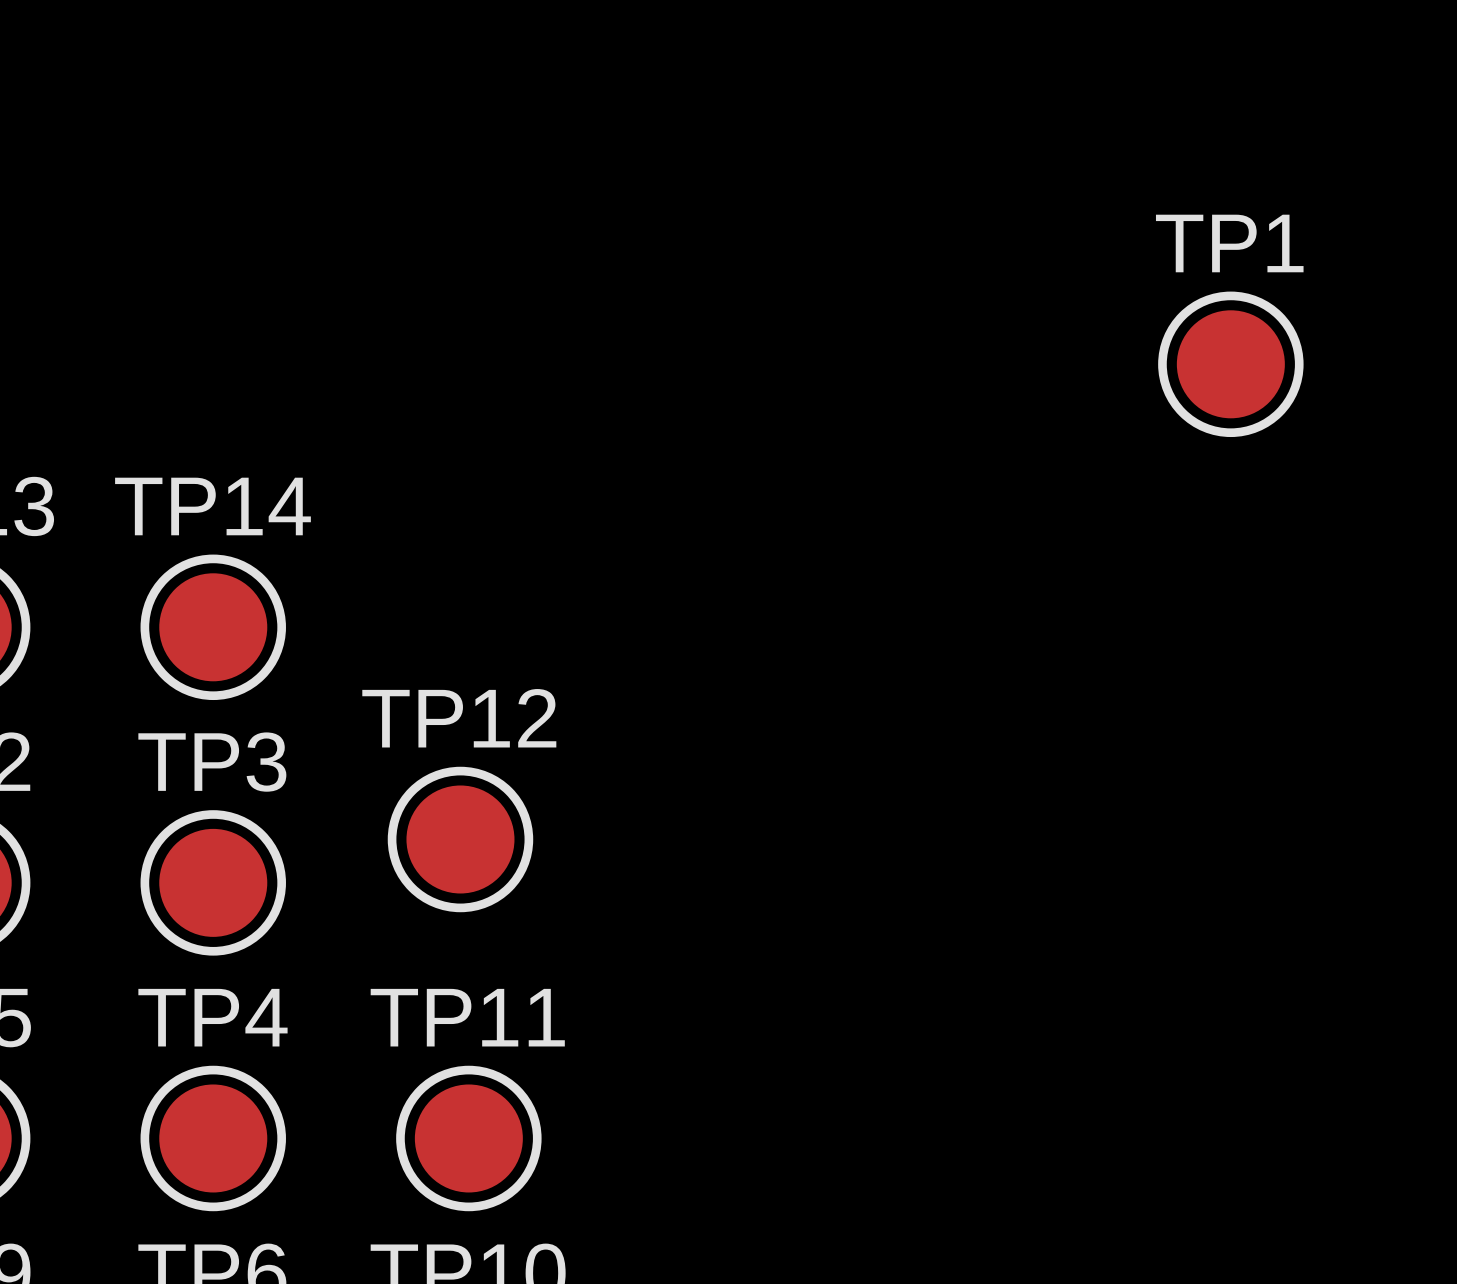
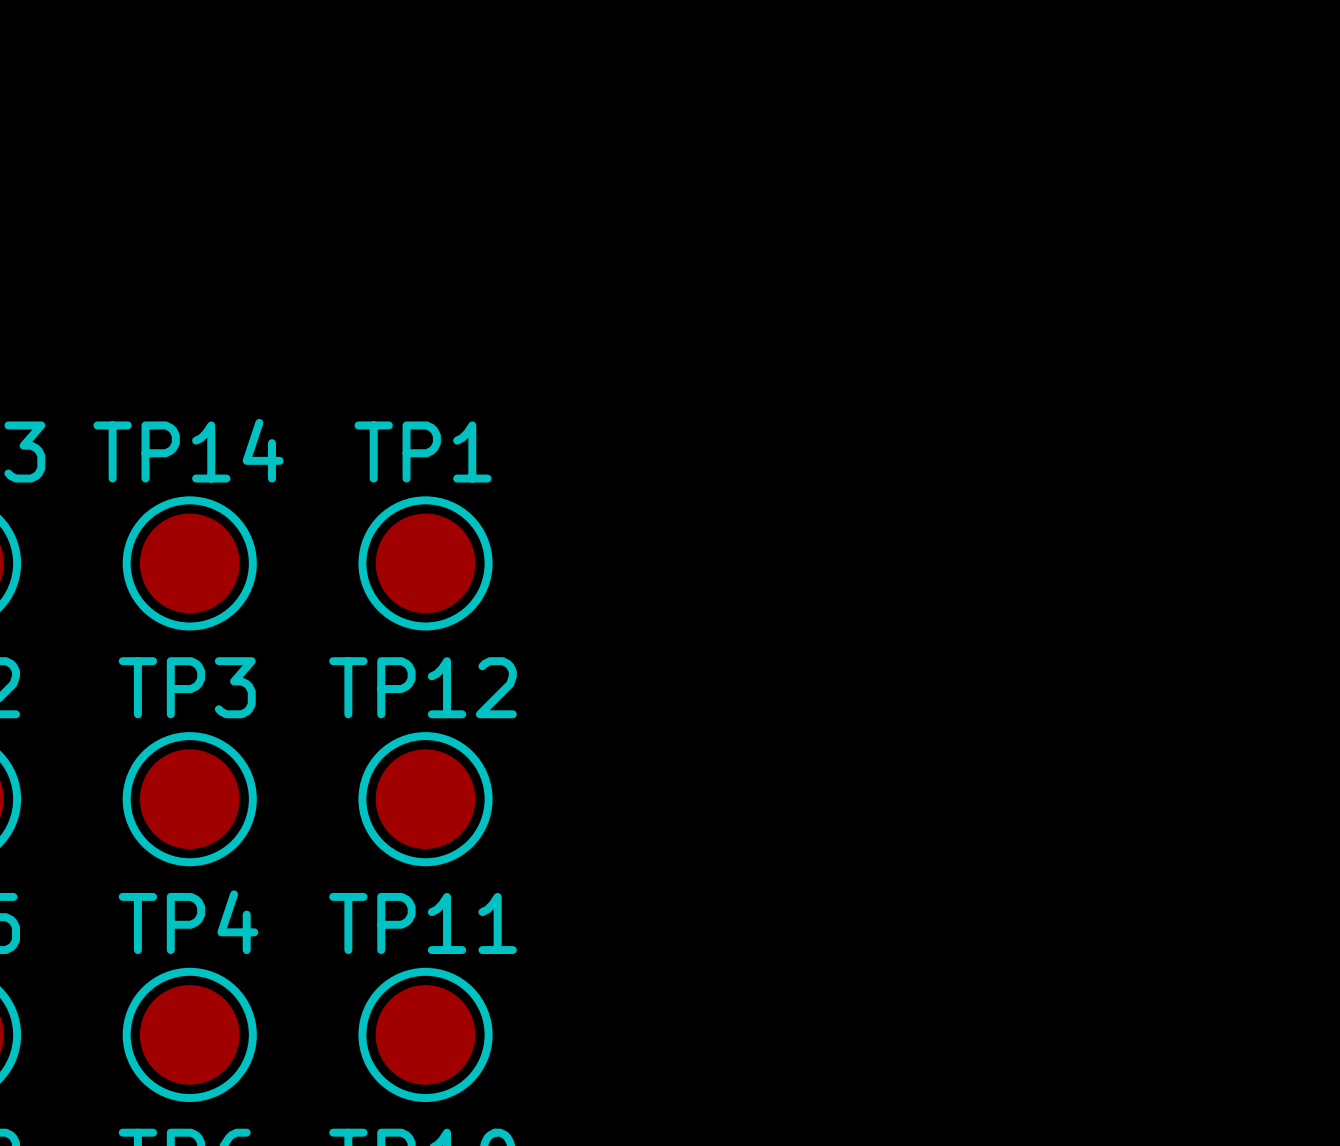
TP1 position: (1230, 364) -> (425, 563)
TP12 position: (460, 839) -> (425, 799)

